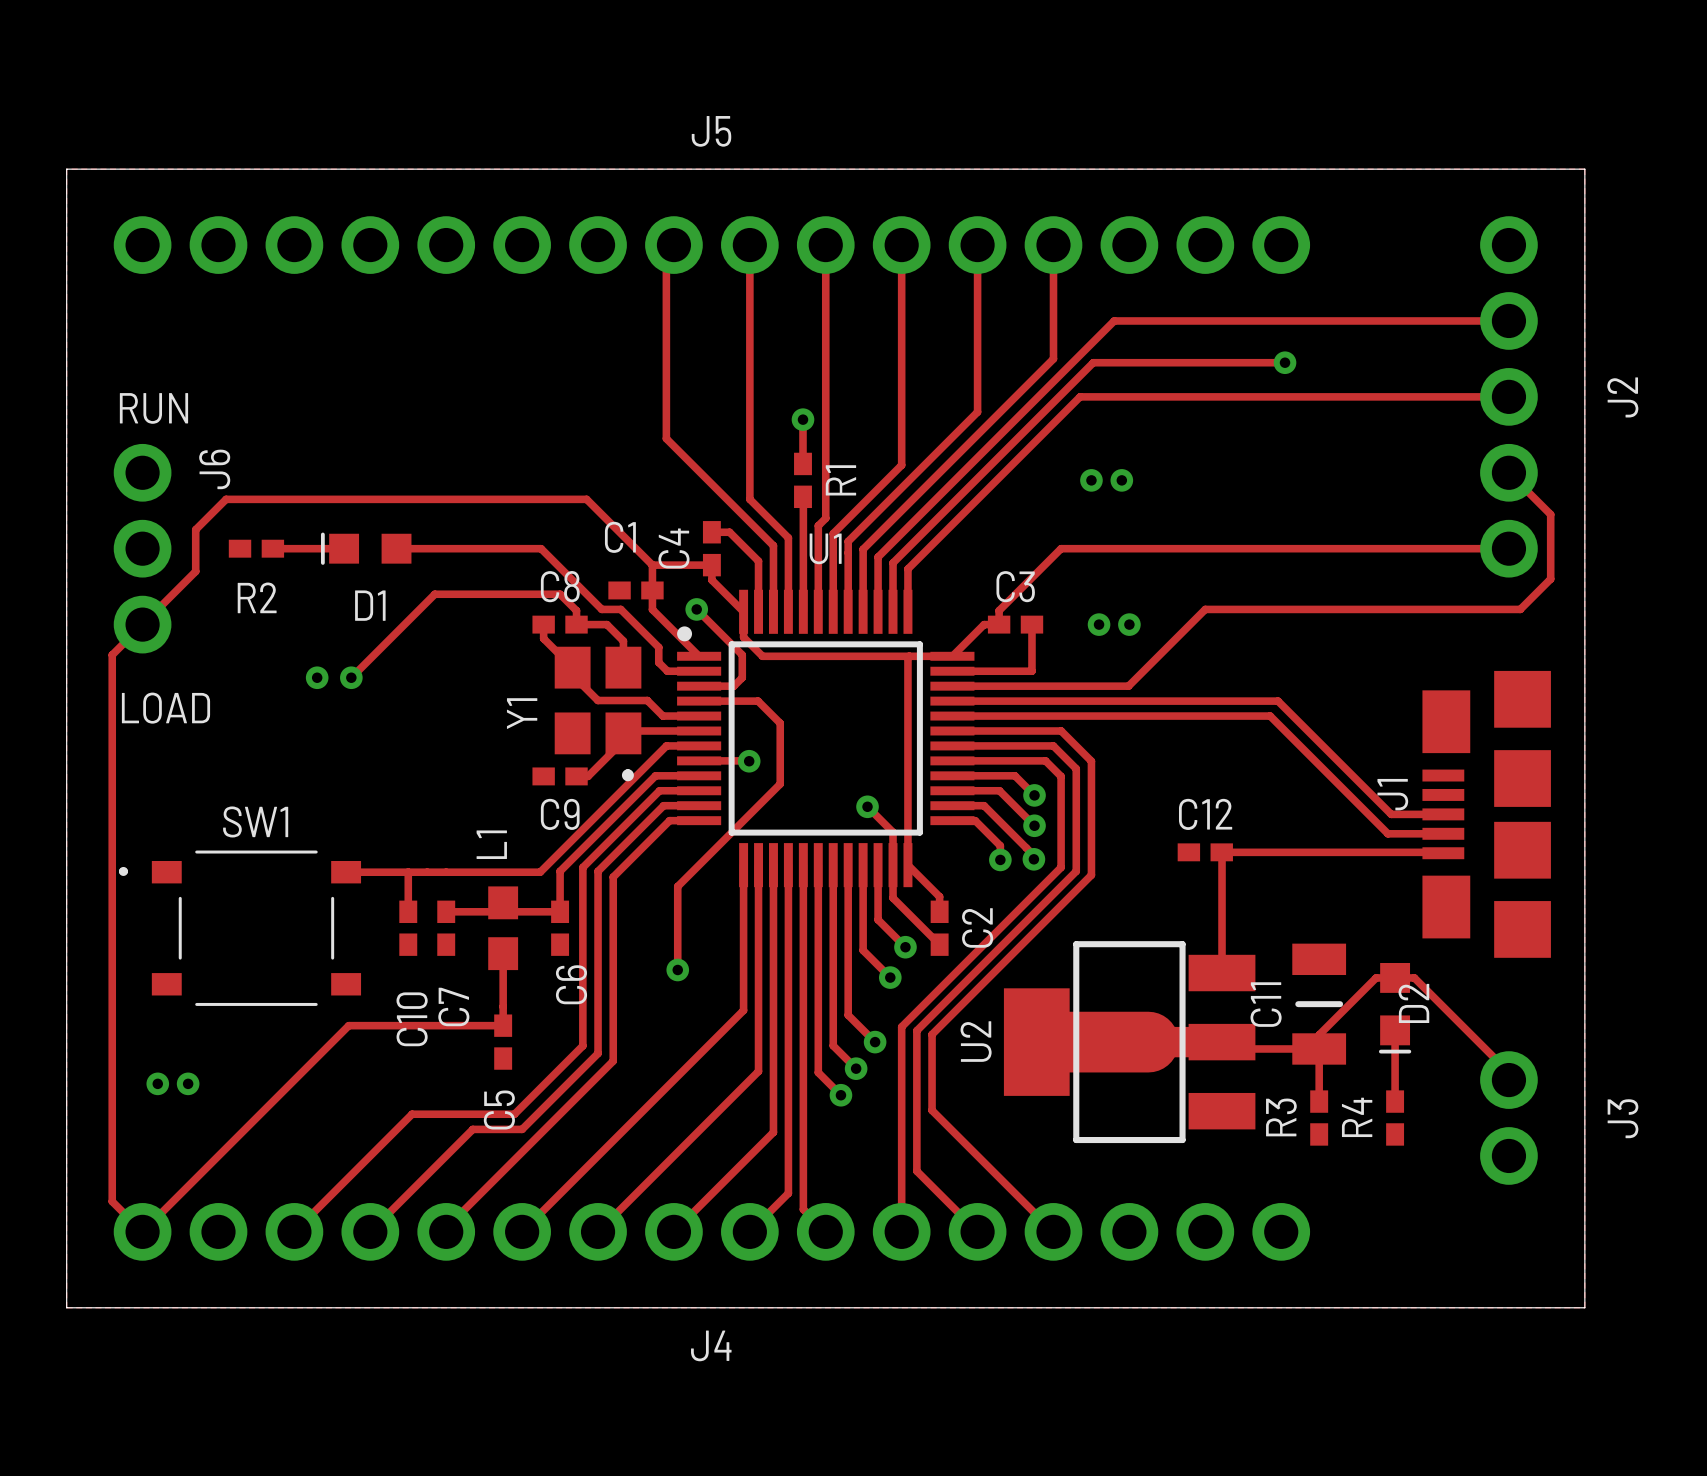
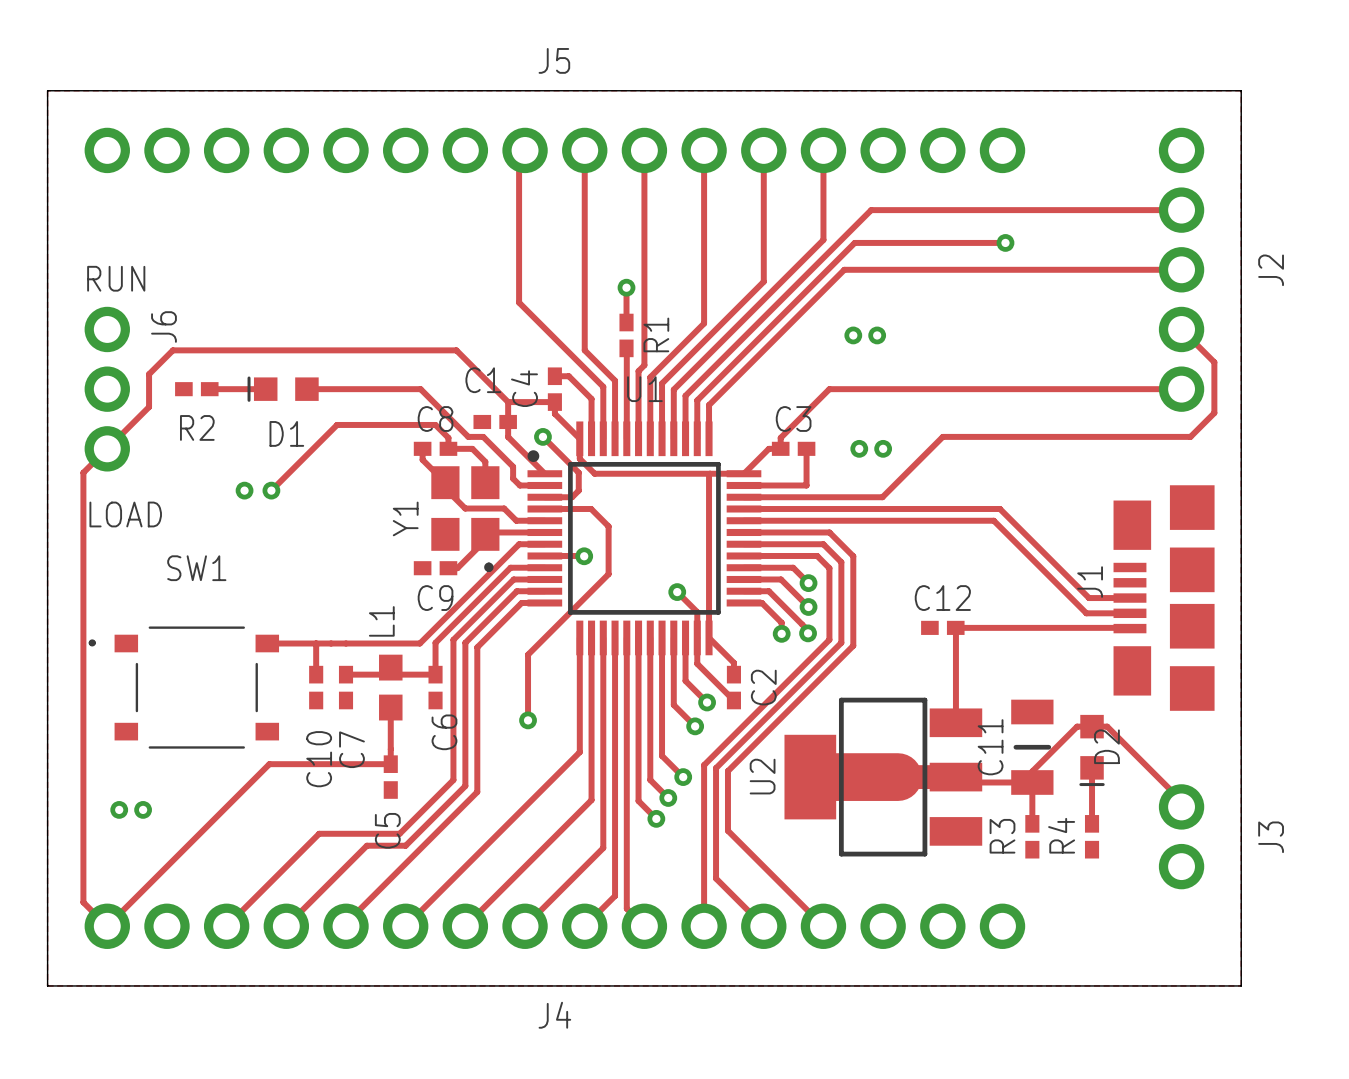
SW1 name position: SW1 (255, 821) -> SW1 (196, 568)

